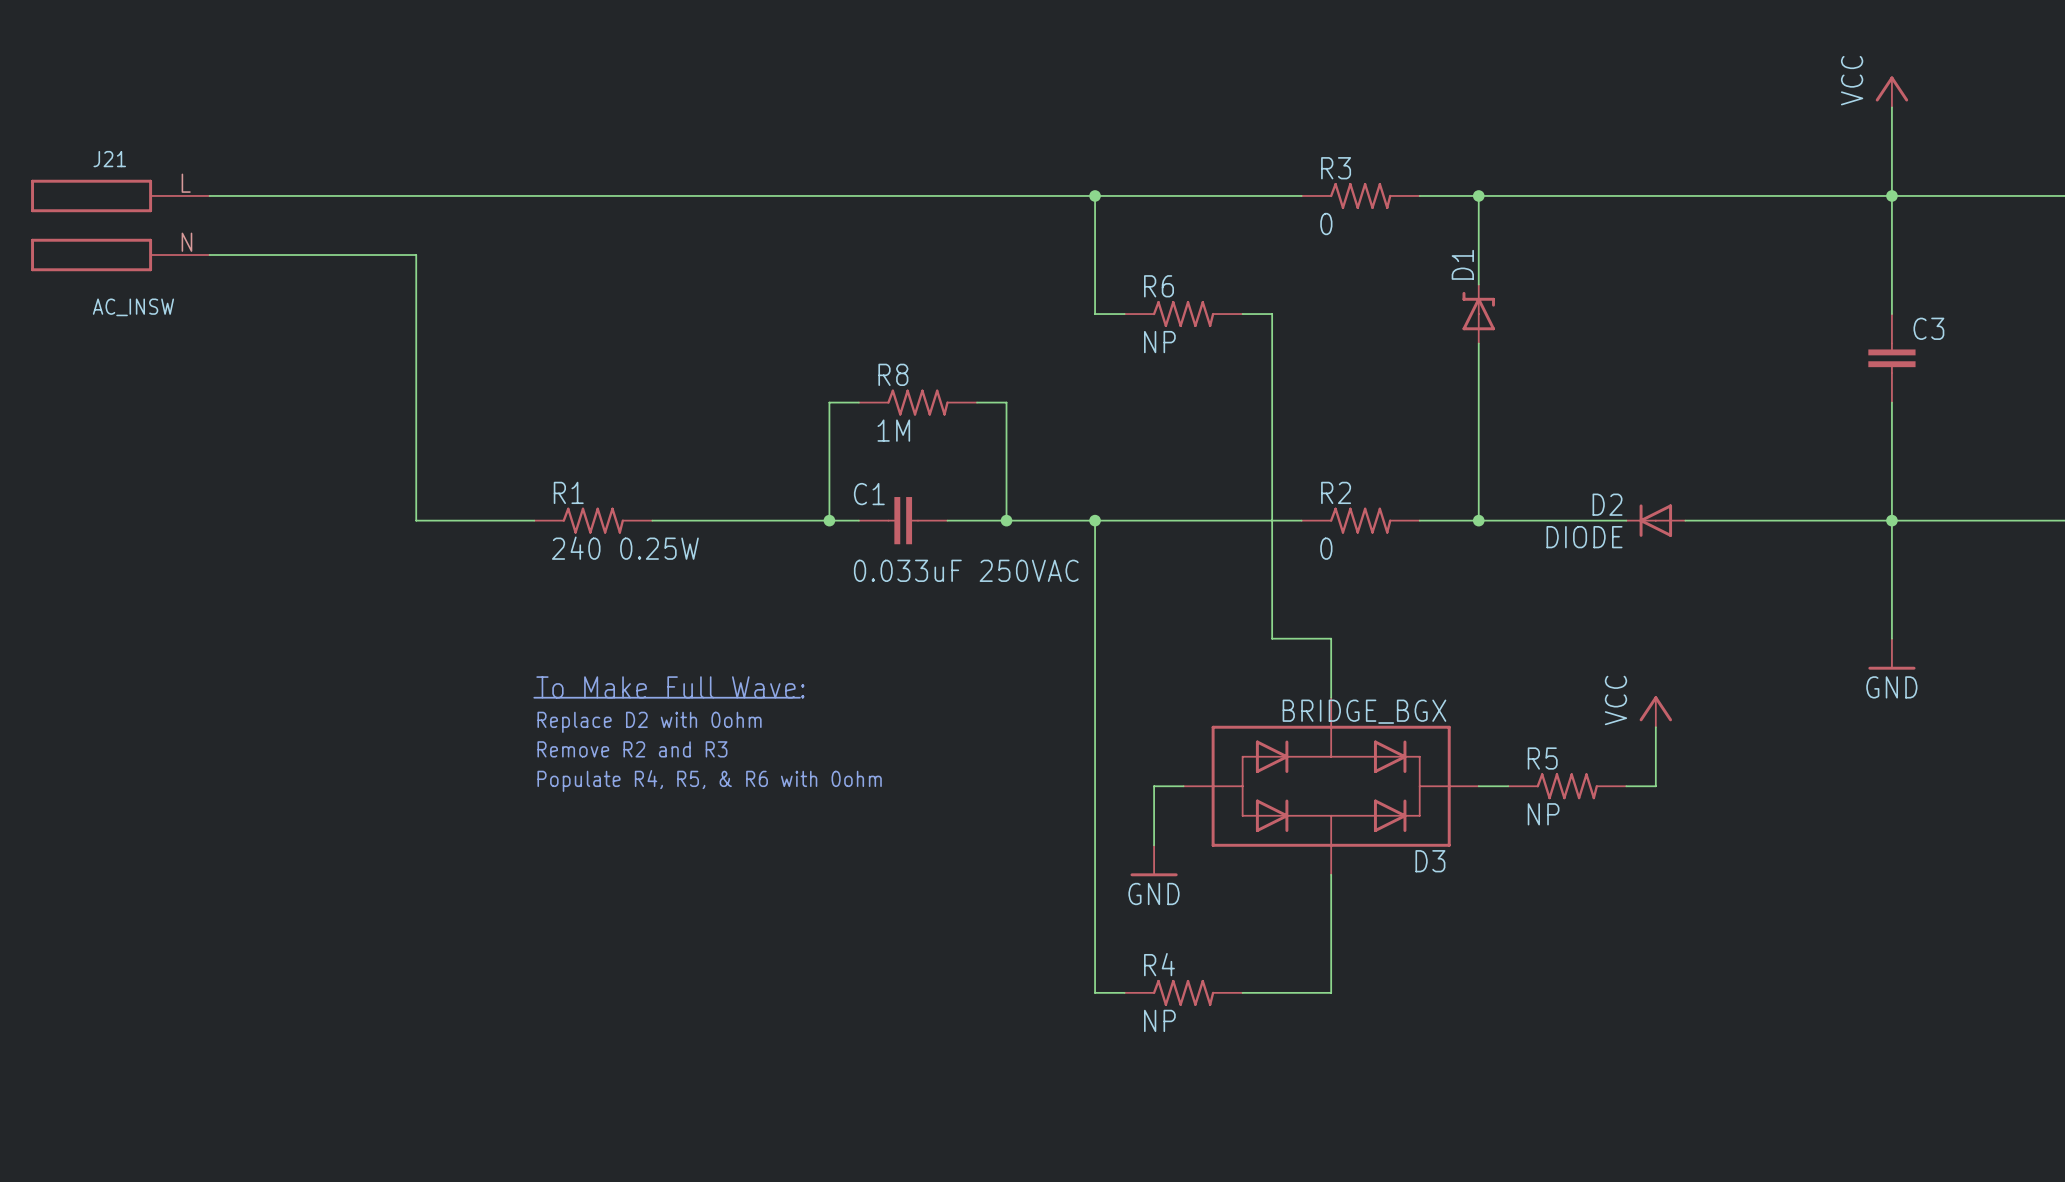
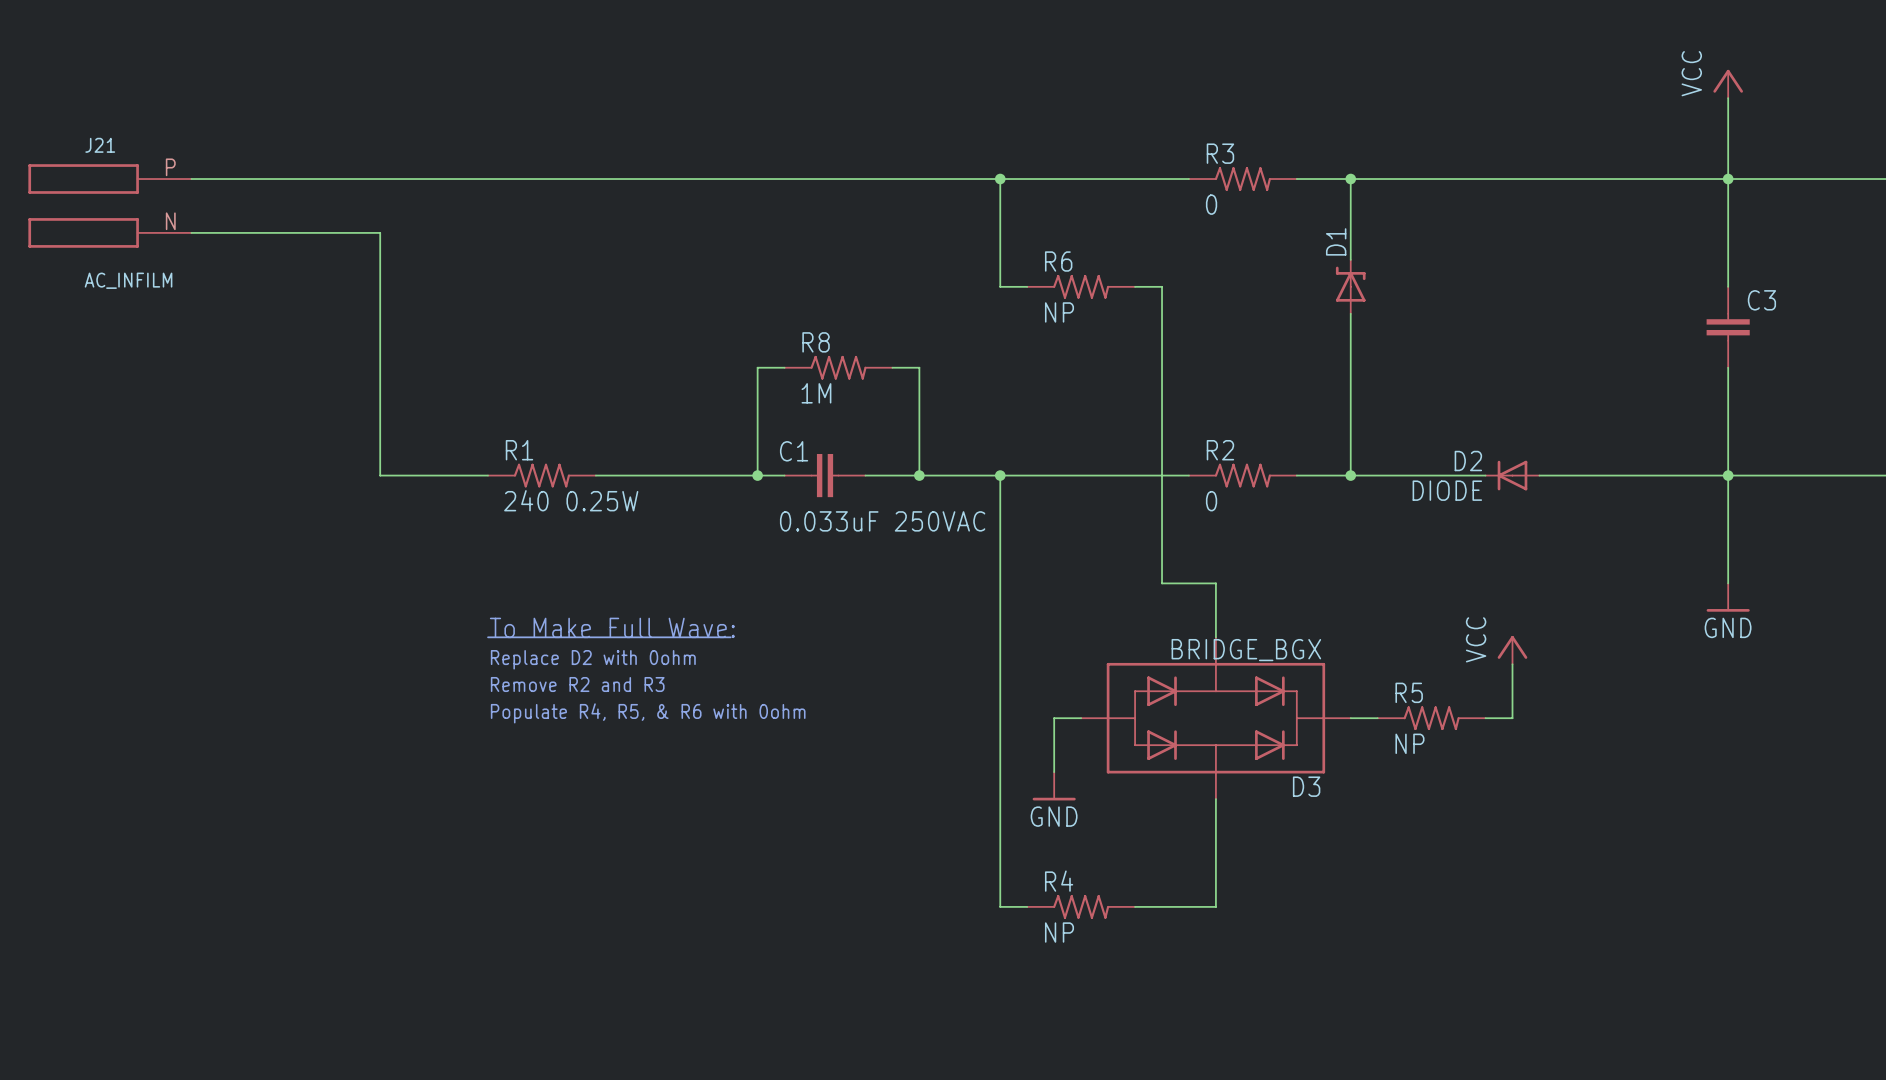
J21 pin number: L (186, 183) -> P (170, 167)
J21 value: AC_INSW (133, 307) -> AC_INFILM (128, 280)

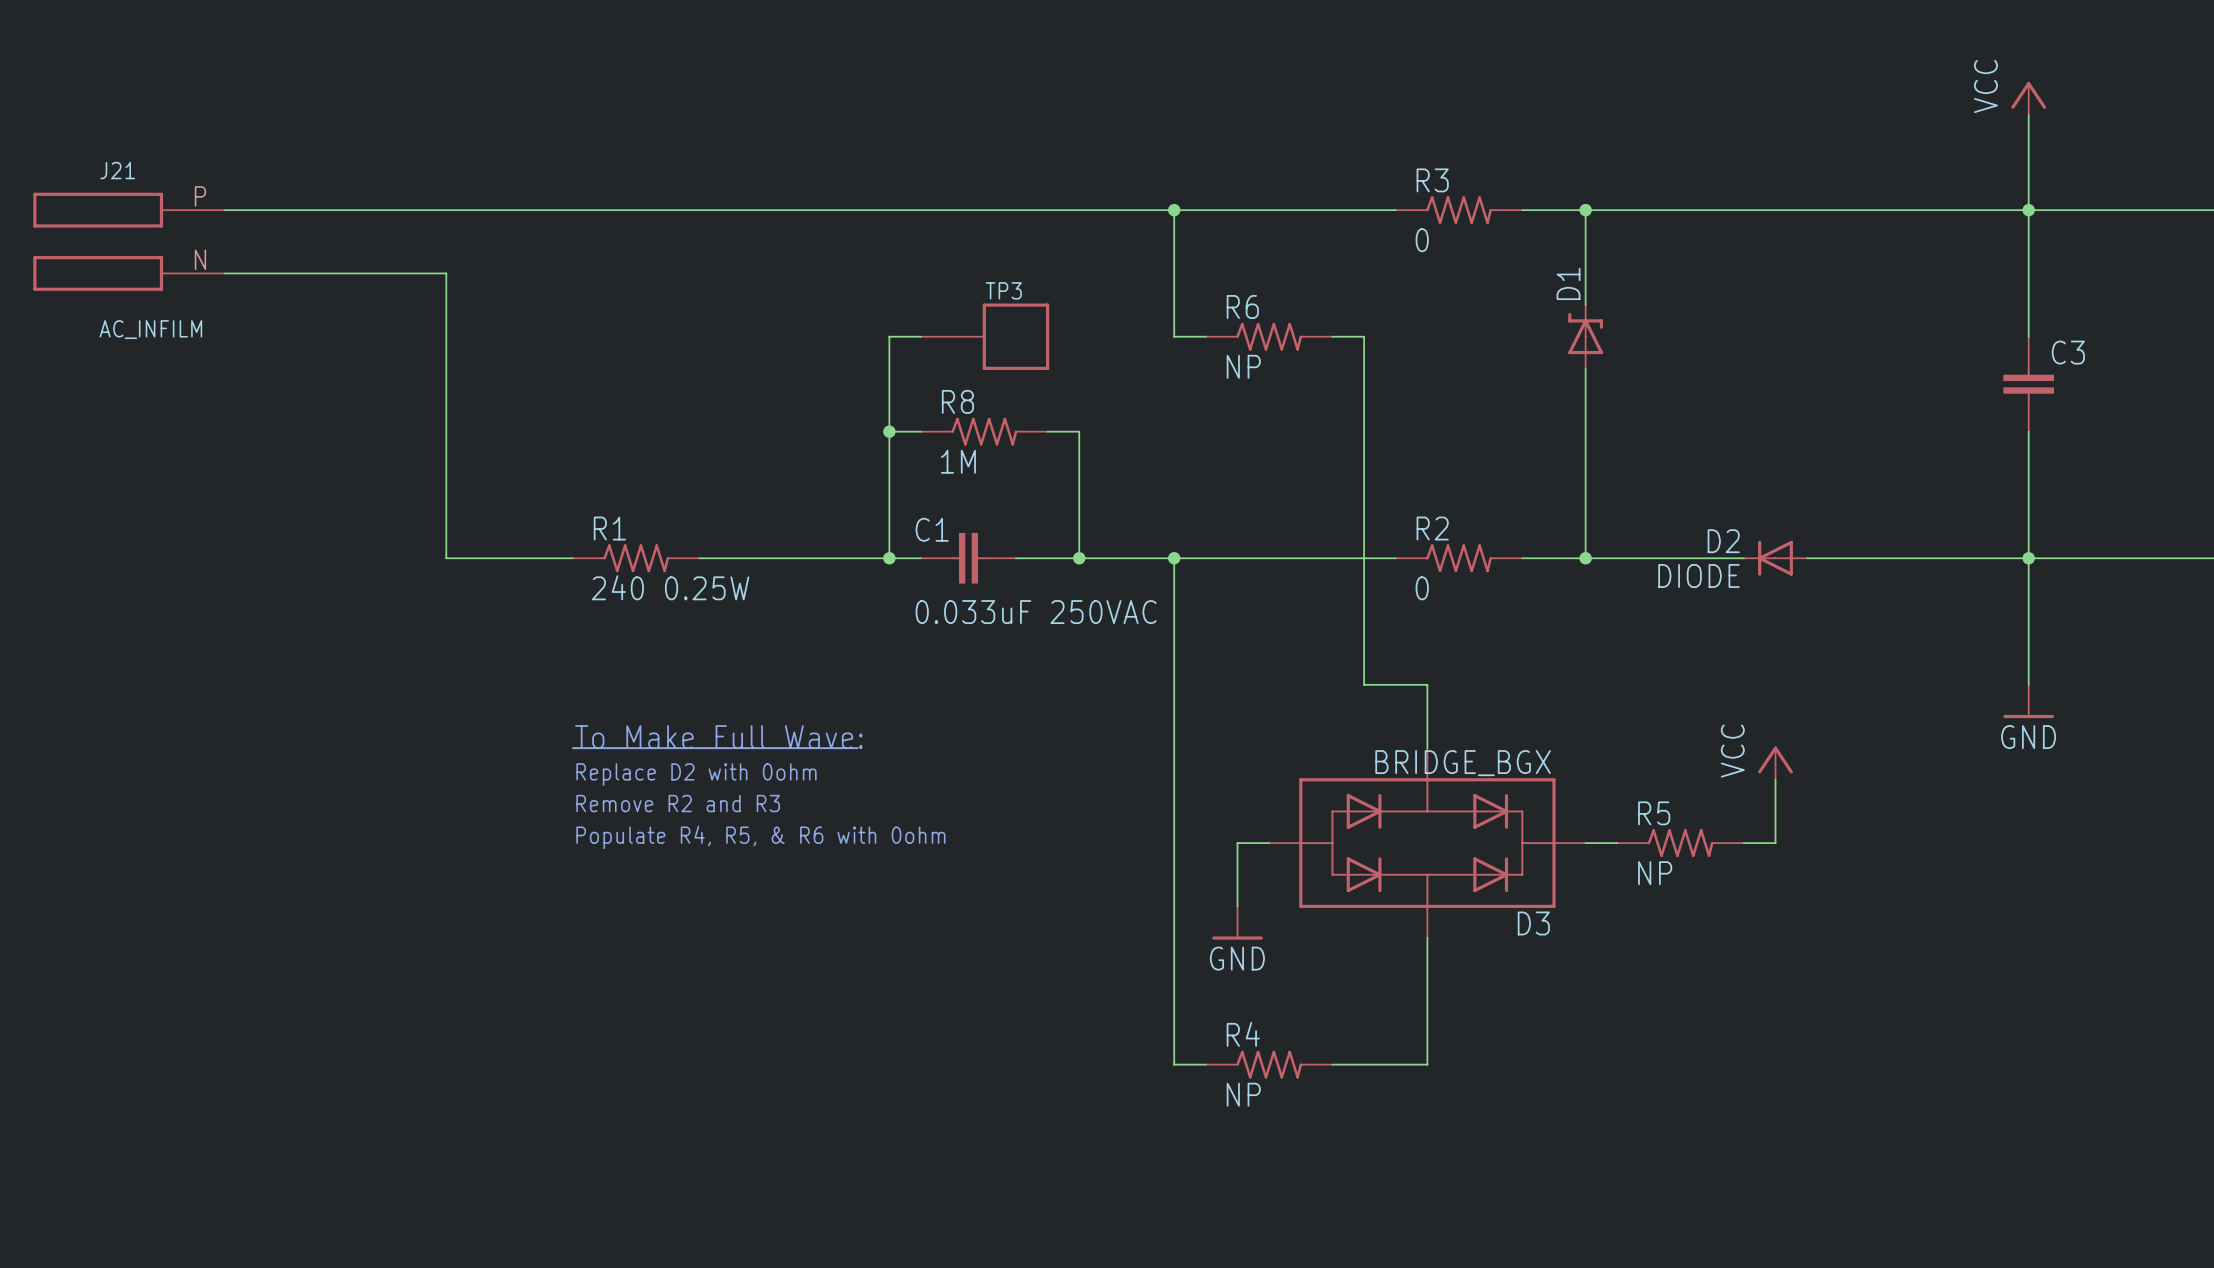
wire: none -> (921, 336) (889, 336) (889, 431)
TP3: none -> (985, 336)
junction: none -> (889, 431)

